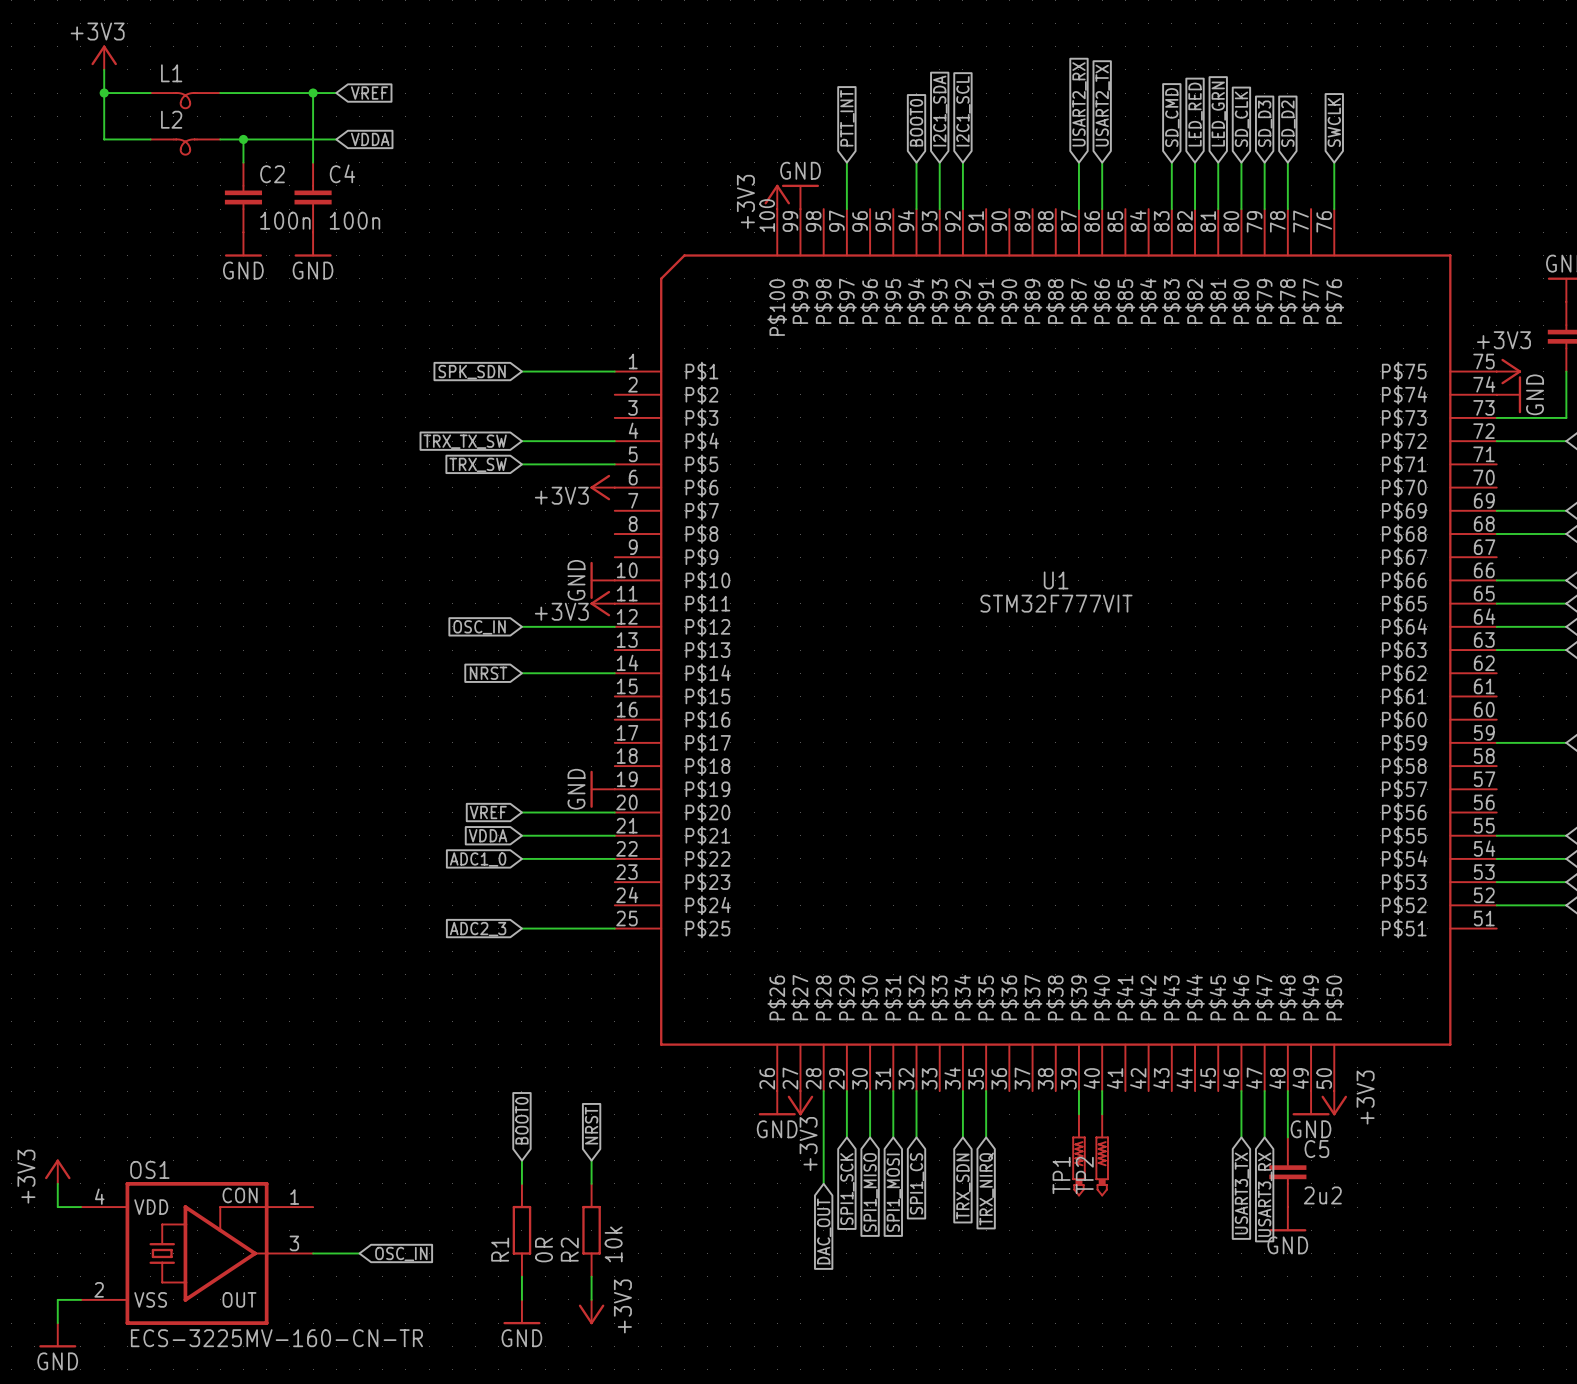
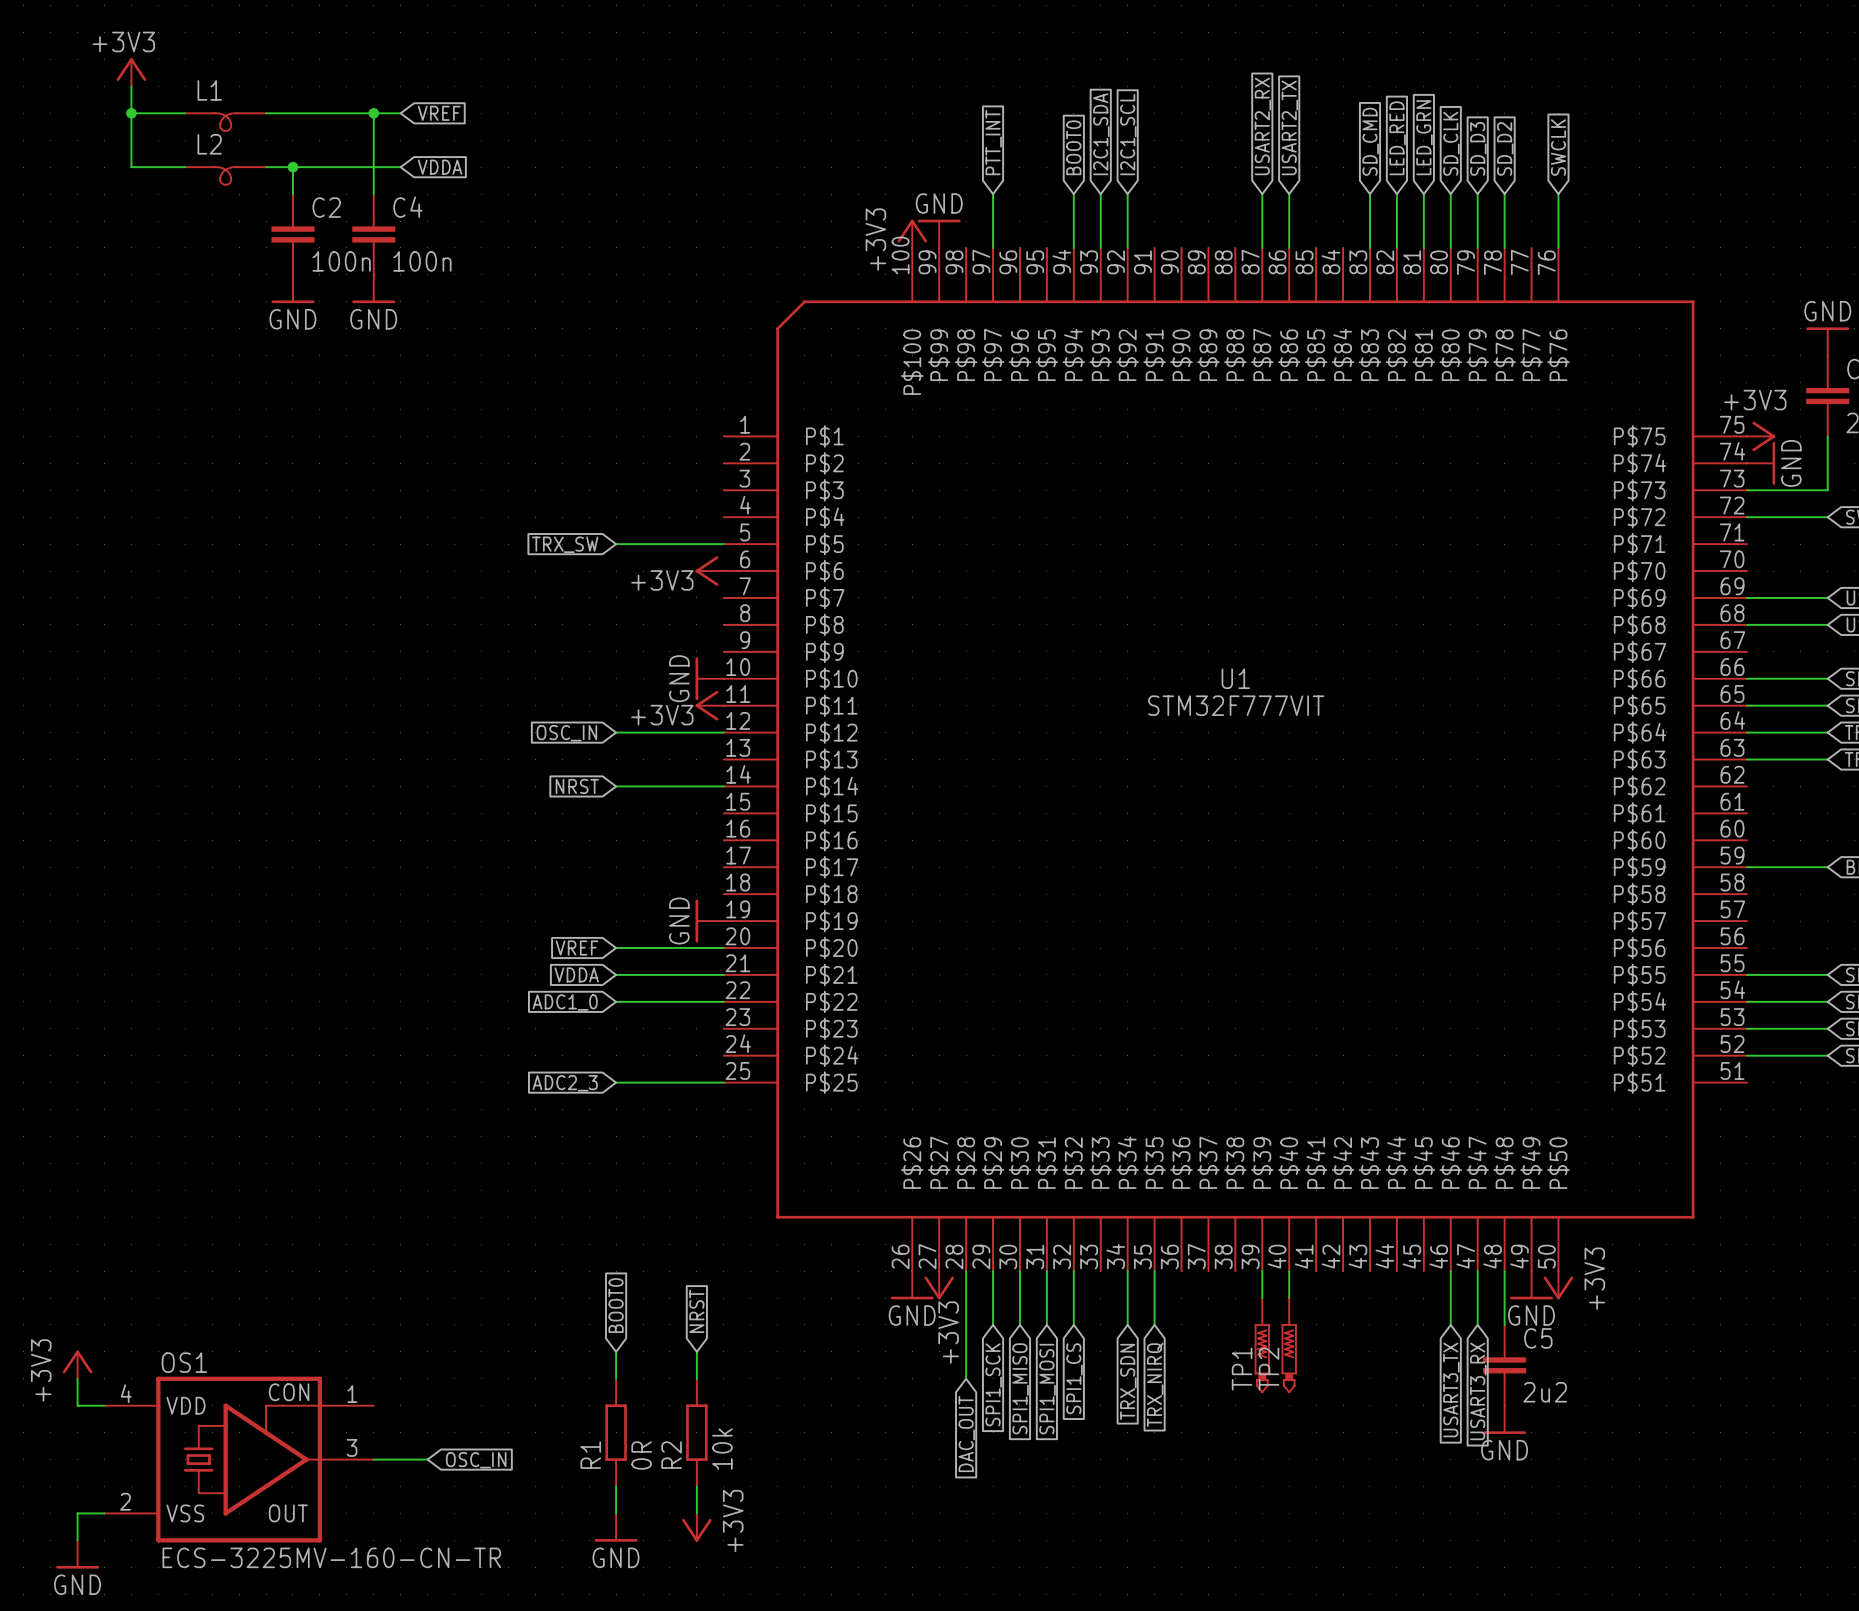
wire: (521, 371) (614, 371) -> none
global label: SPK_SDN (472, 372) -> none
global label: TRX_TX_SW (465, 441) -> none
wire: (521, 441) (614, 441) -> none

